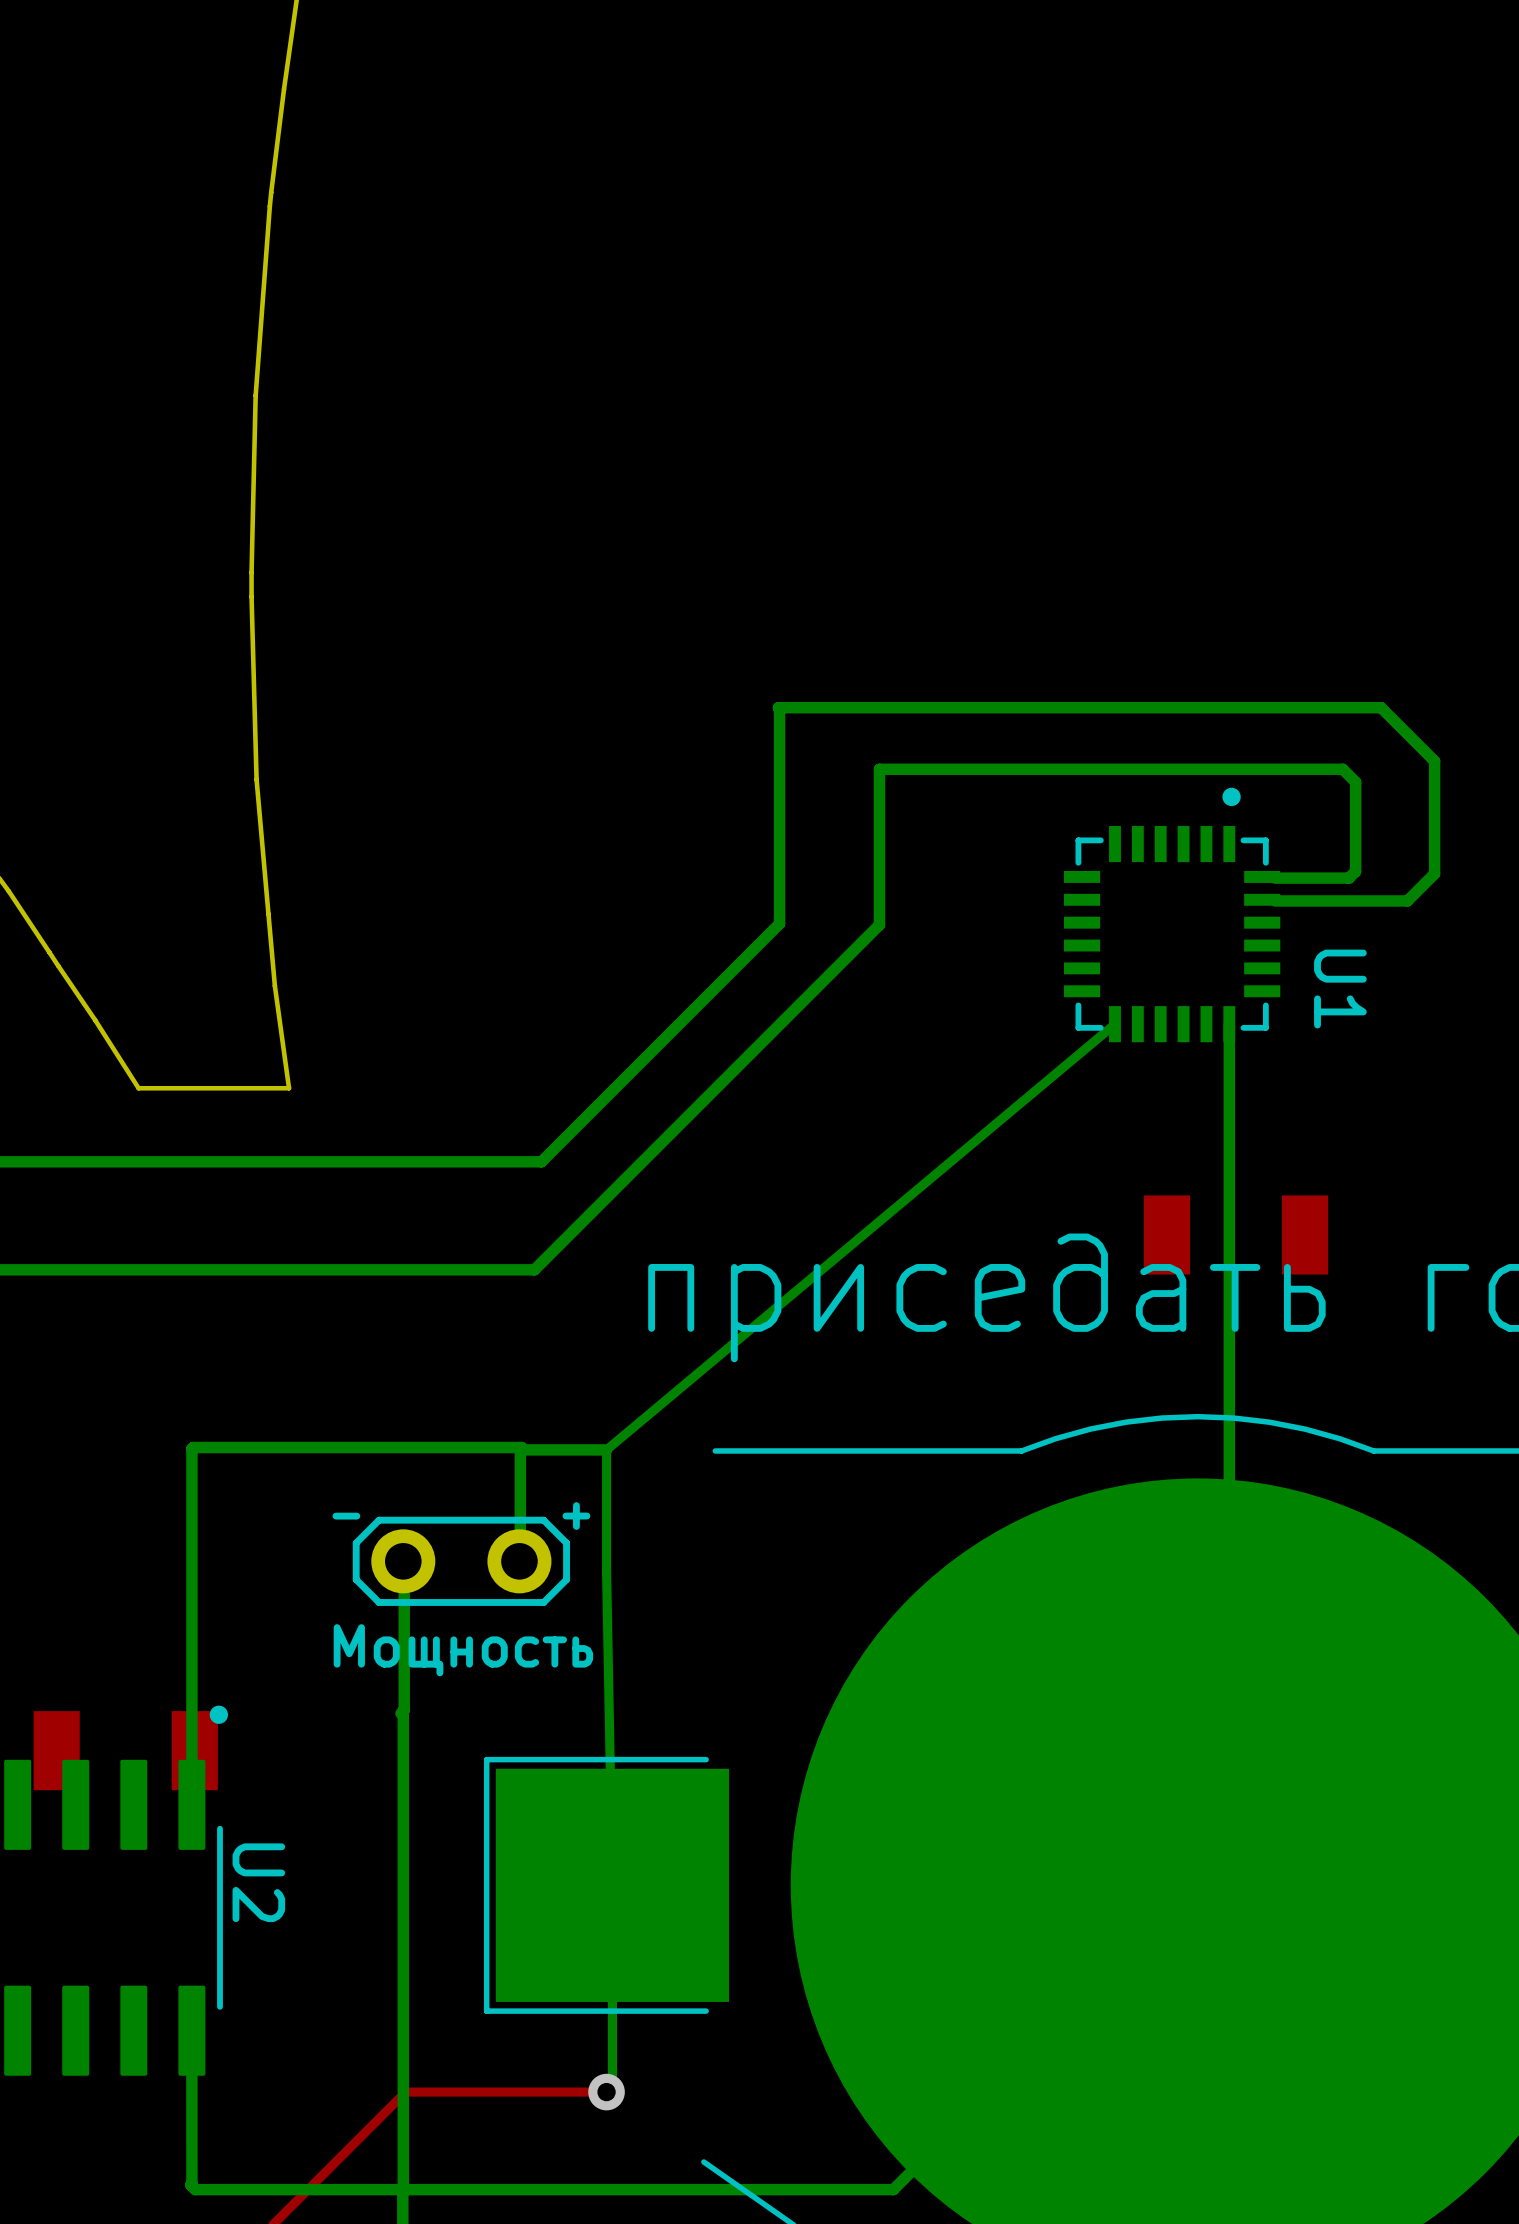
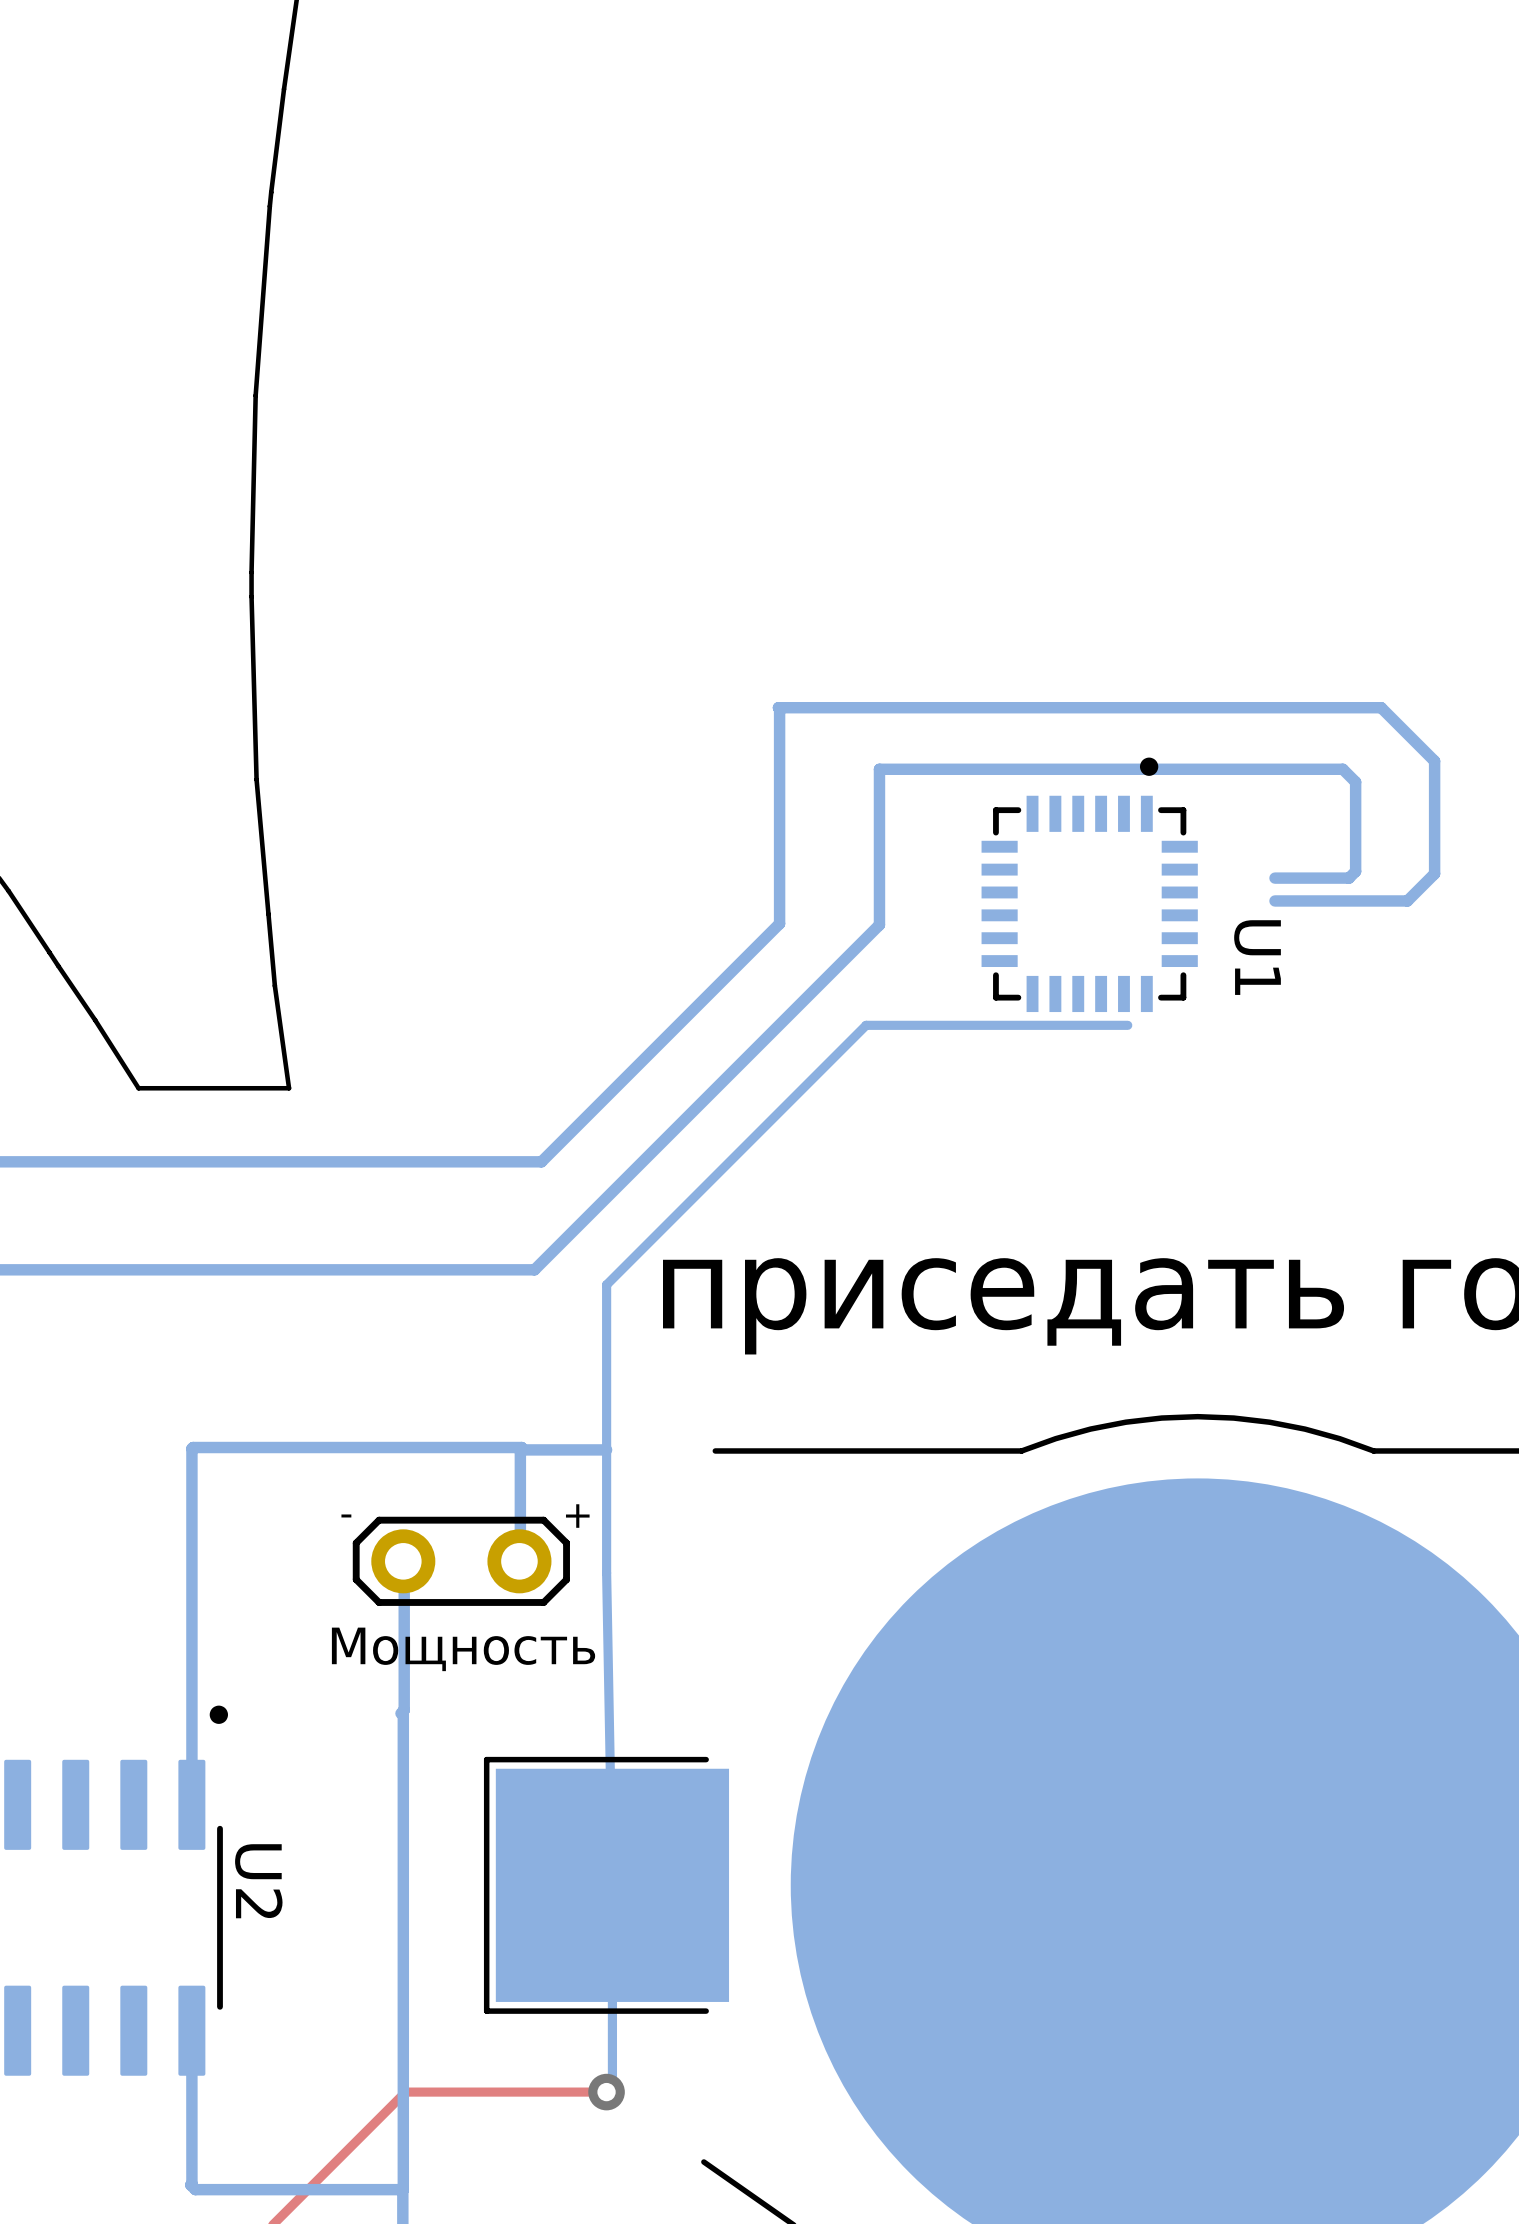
U1 position: (1172, 915) -> (1089, 884)
bottom track: (1114, 1024) (606, 1449) -> (1127, 1025) (866, 1025) (606, 1284) (606, 1449)
bottom track: (1229, 1024) (1229, 1853) (893, 2189) (403, 2189) -> none
part: (1236, 1234) -> none
part: (125, 1750) -> none

